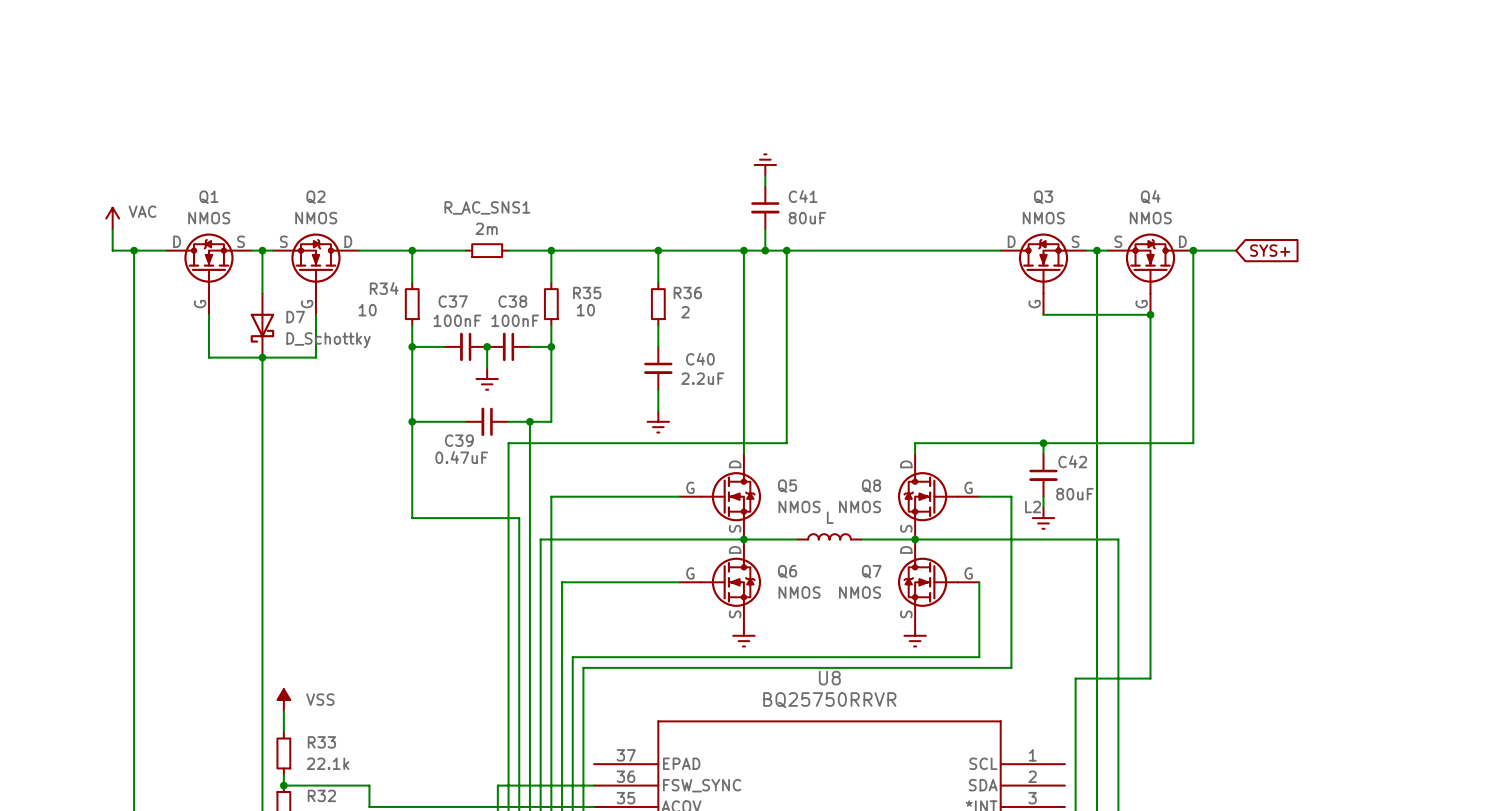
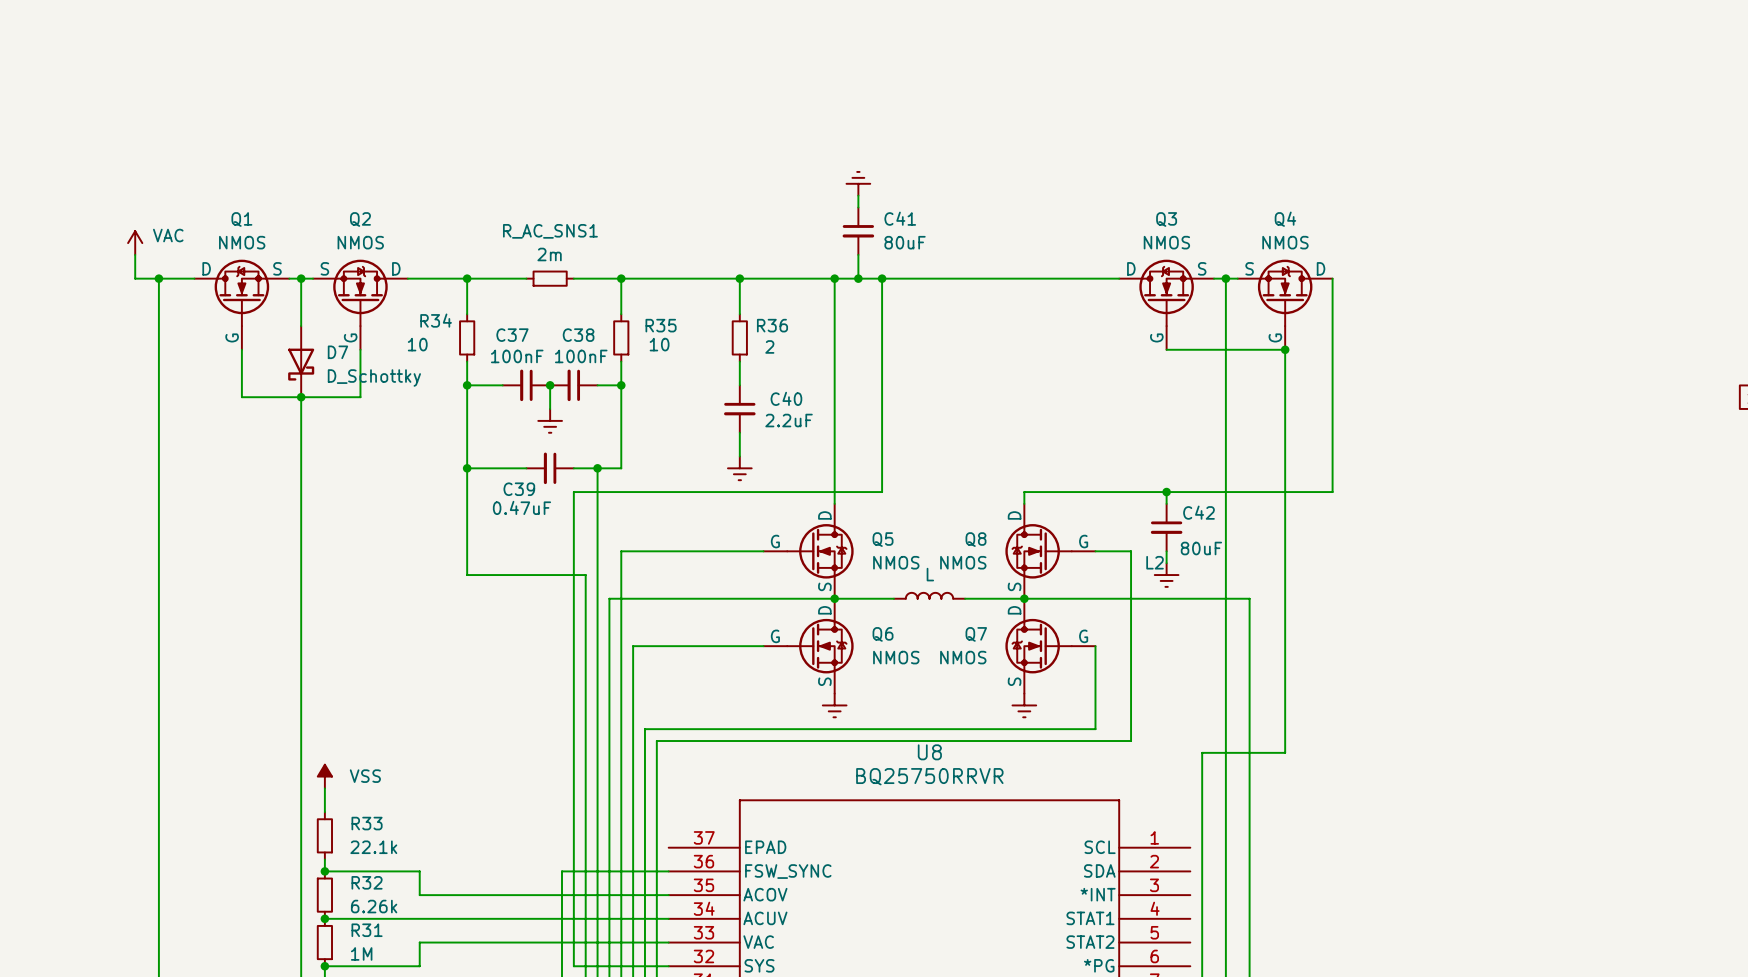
wire: (1193, 250) (1236, 250) -> none
junction: (1193, 250) -> none
global label: SYS+ (1270, 250) -> none

